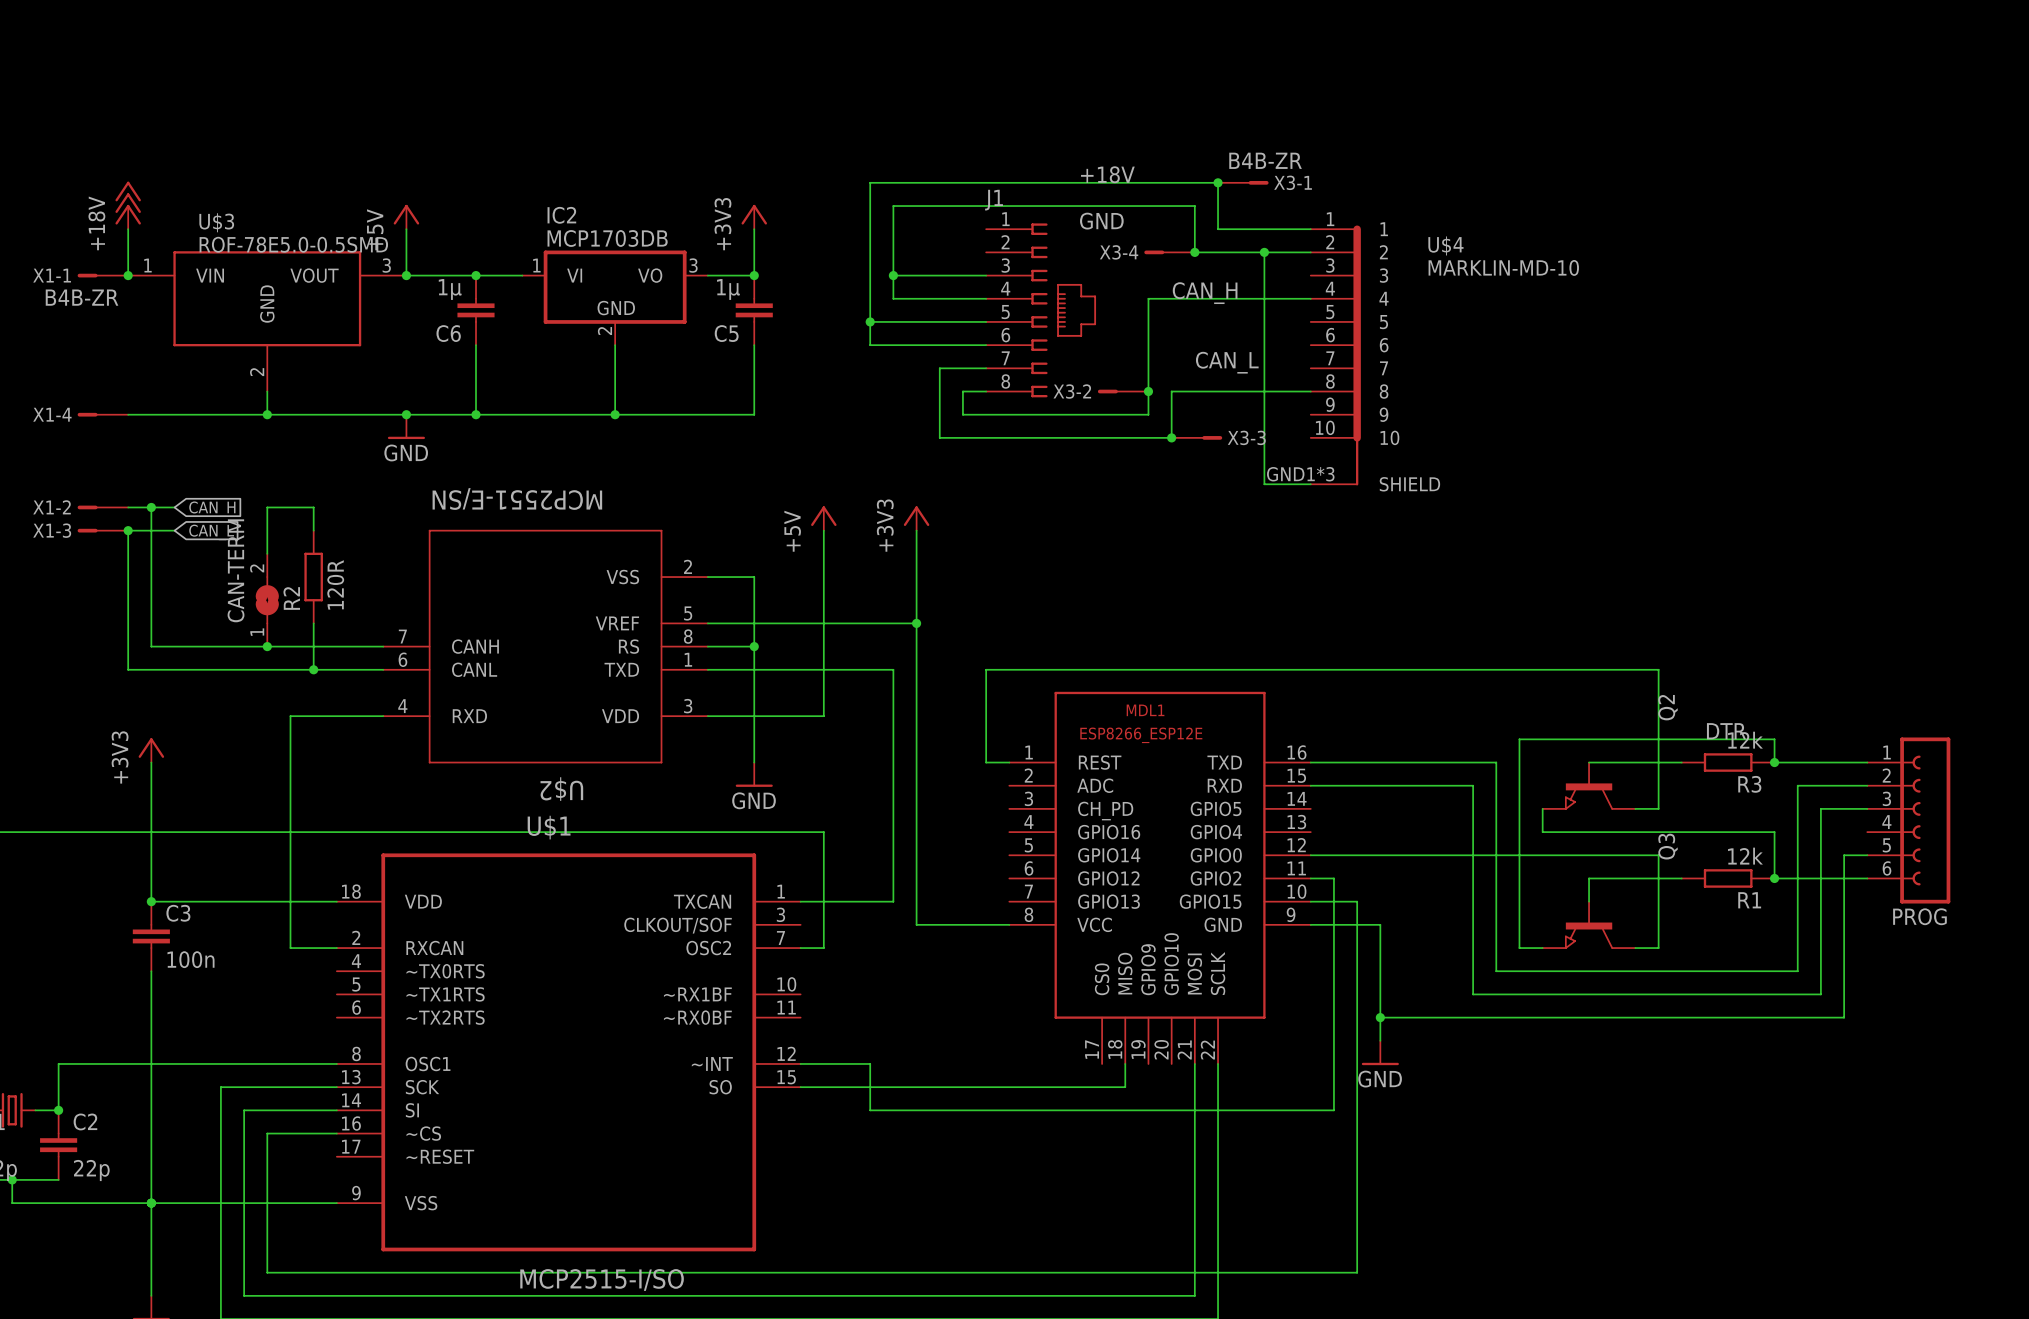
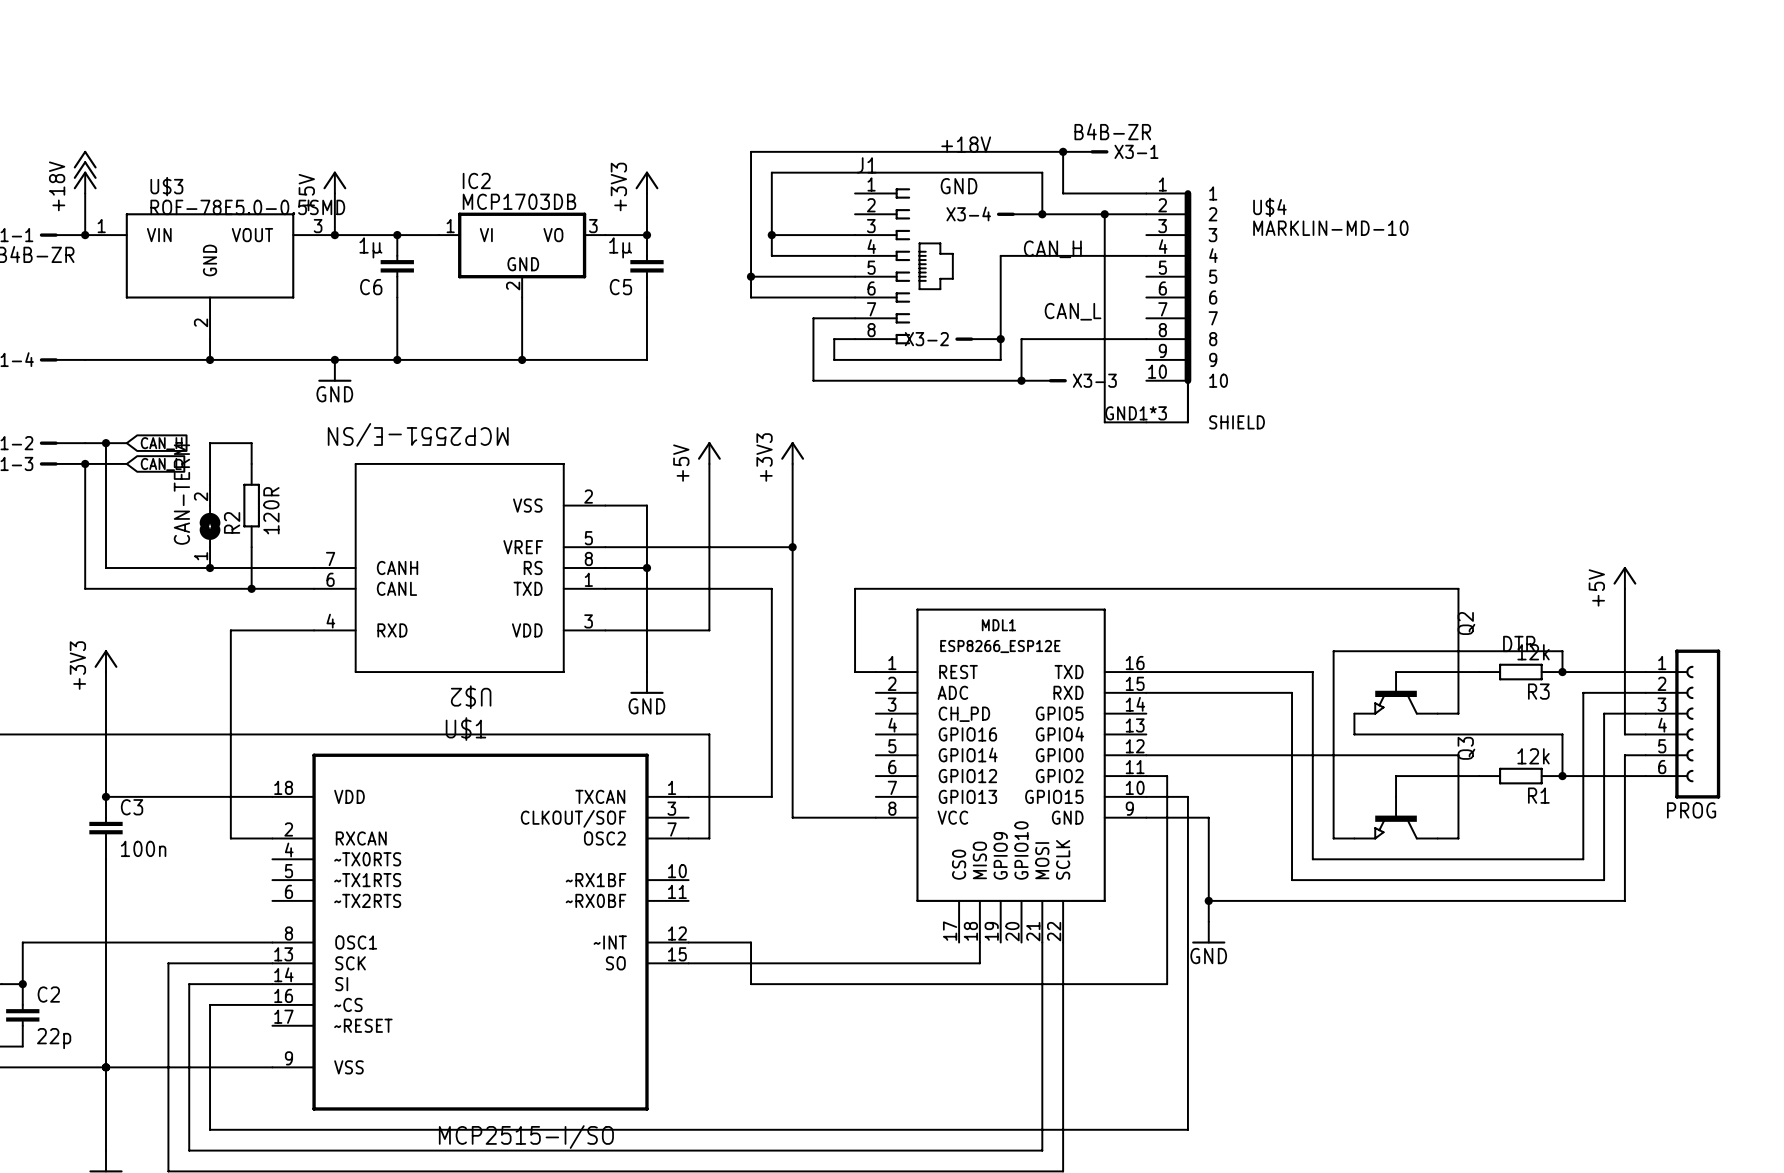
power symbol: none -> +5V (1624, 577)
wire: none -> (1624, 588) (1624, 734) (1645, 734)

